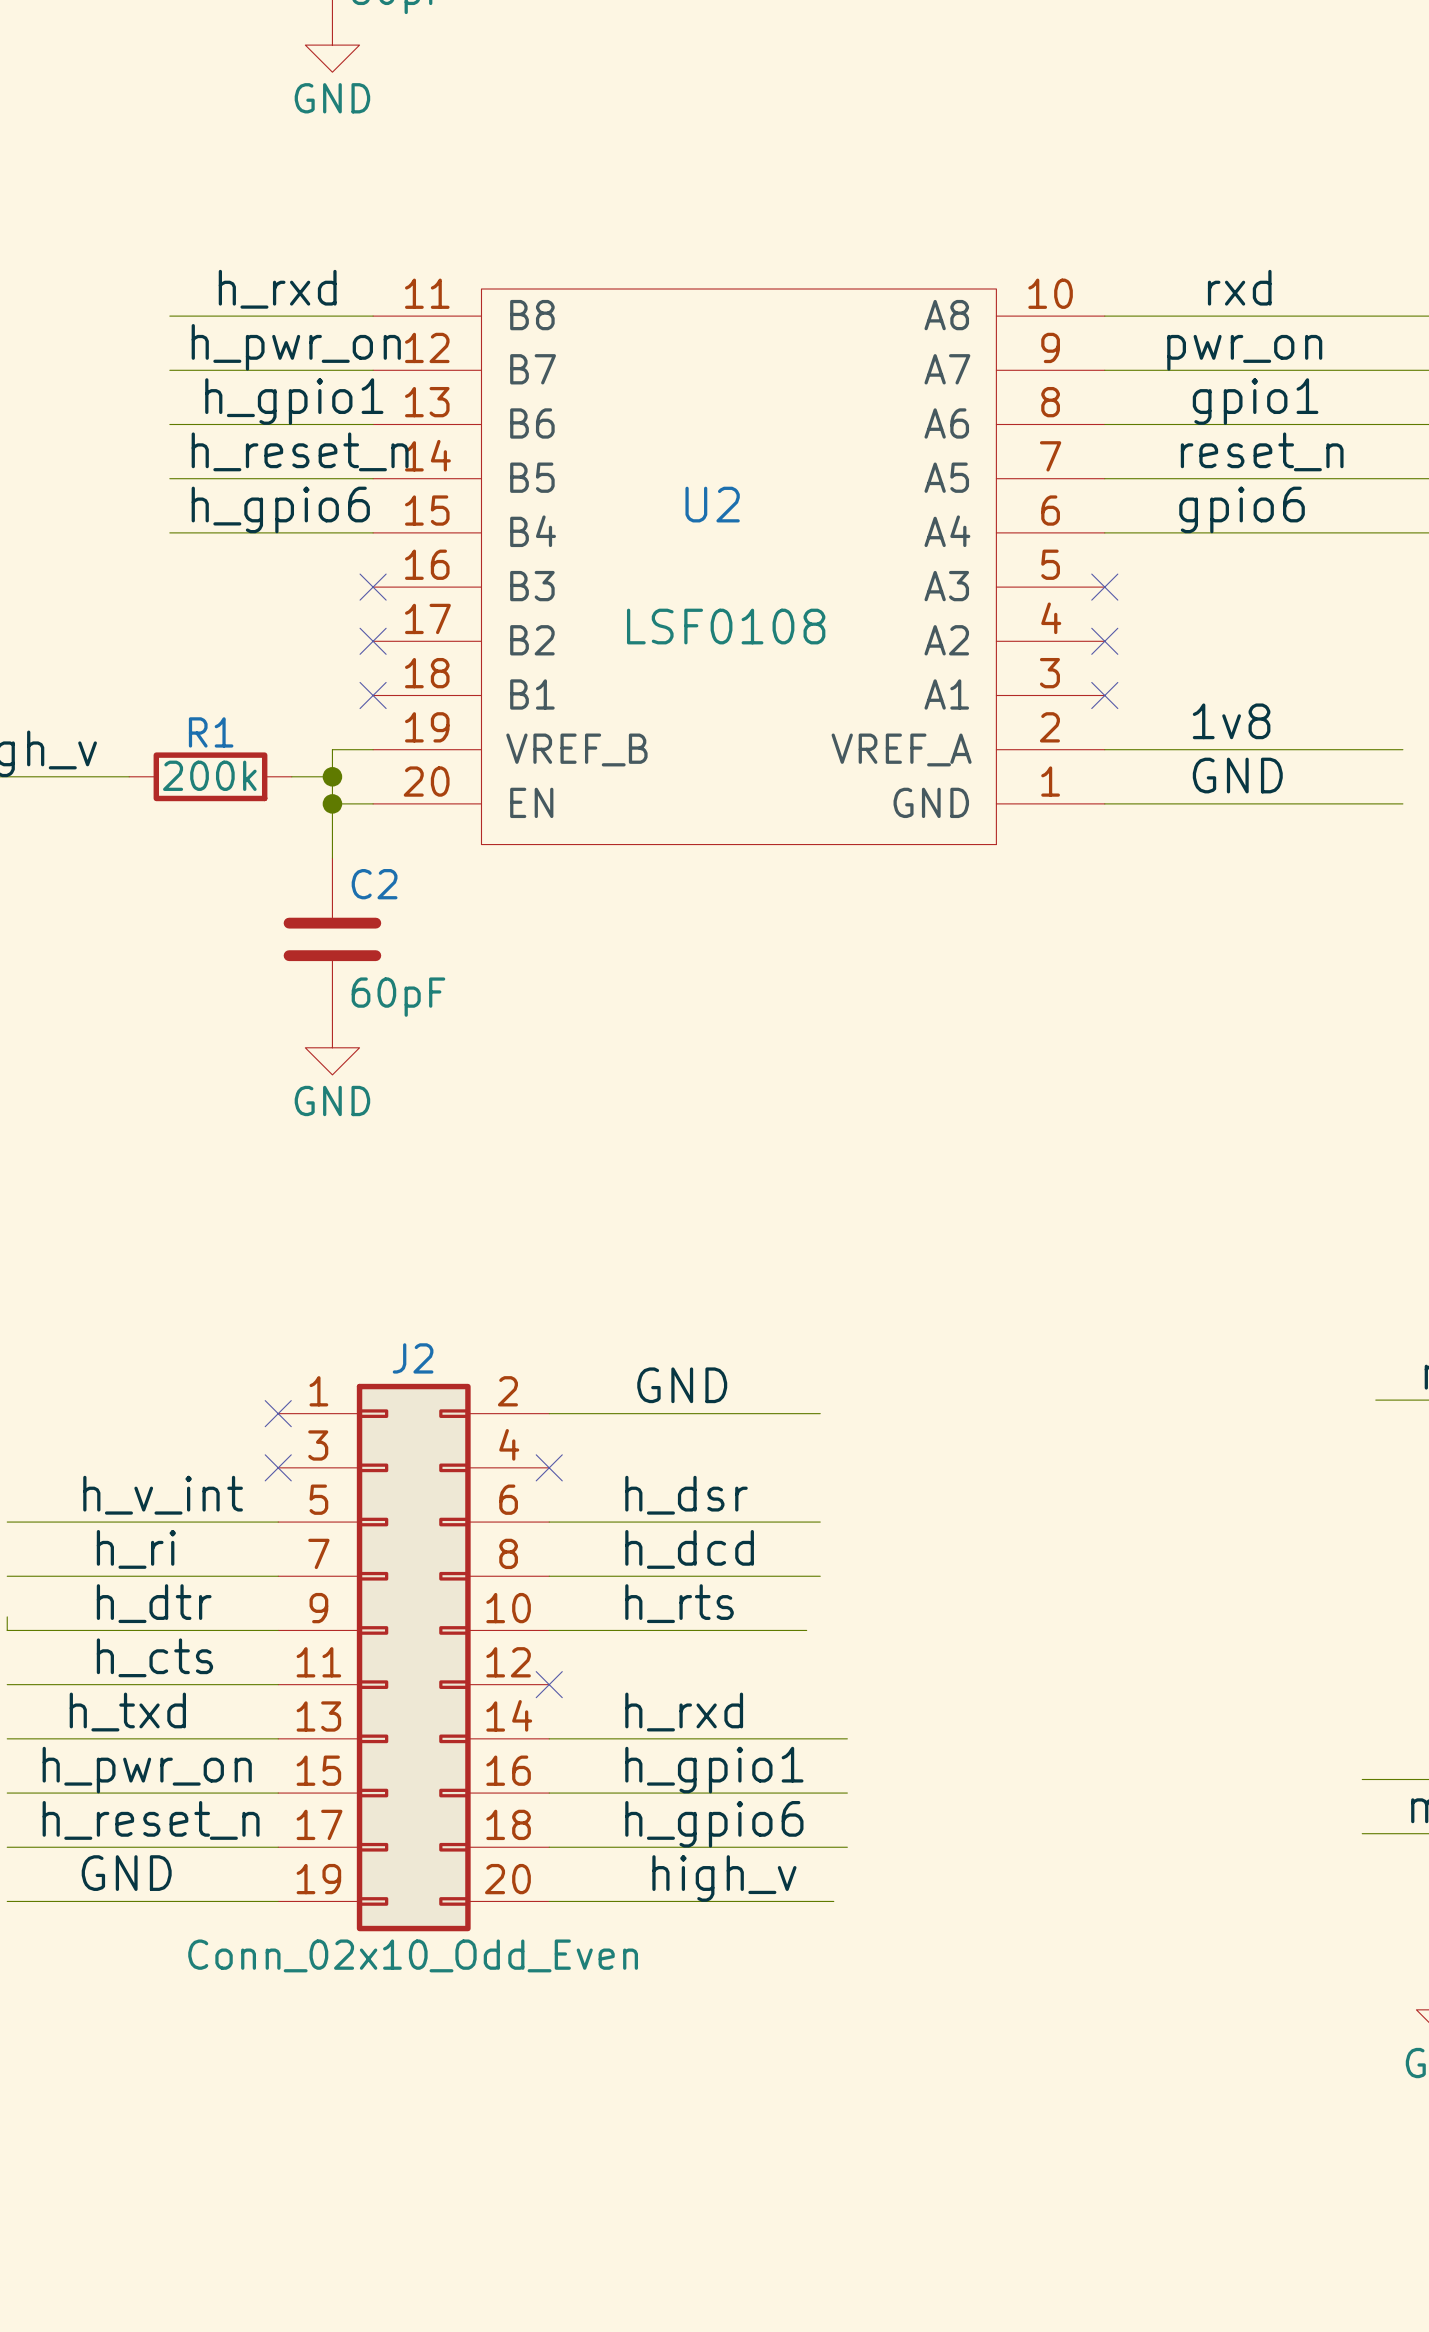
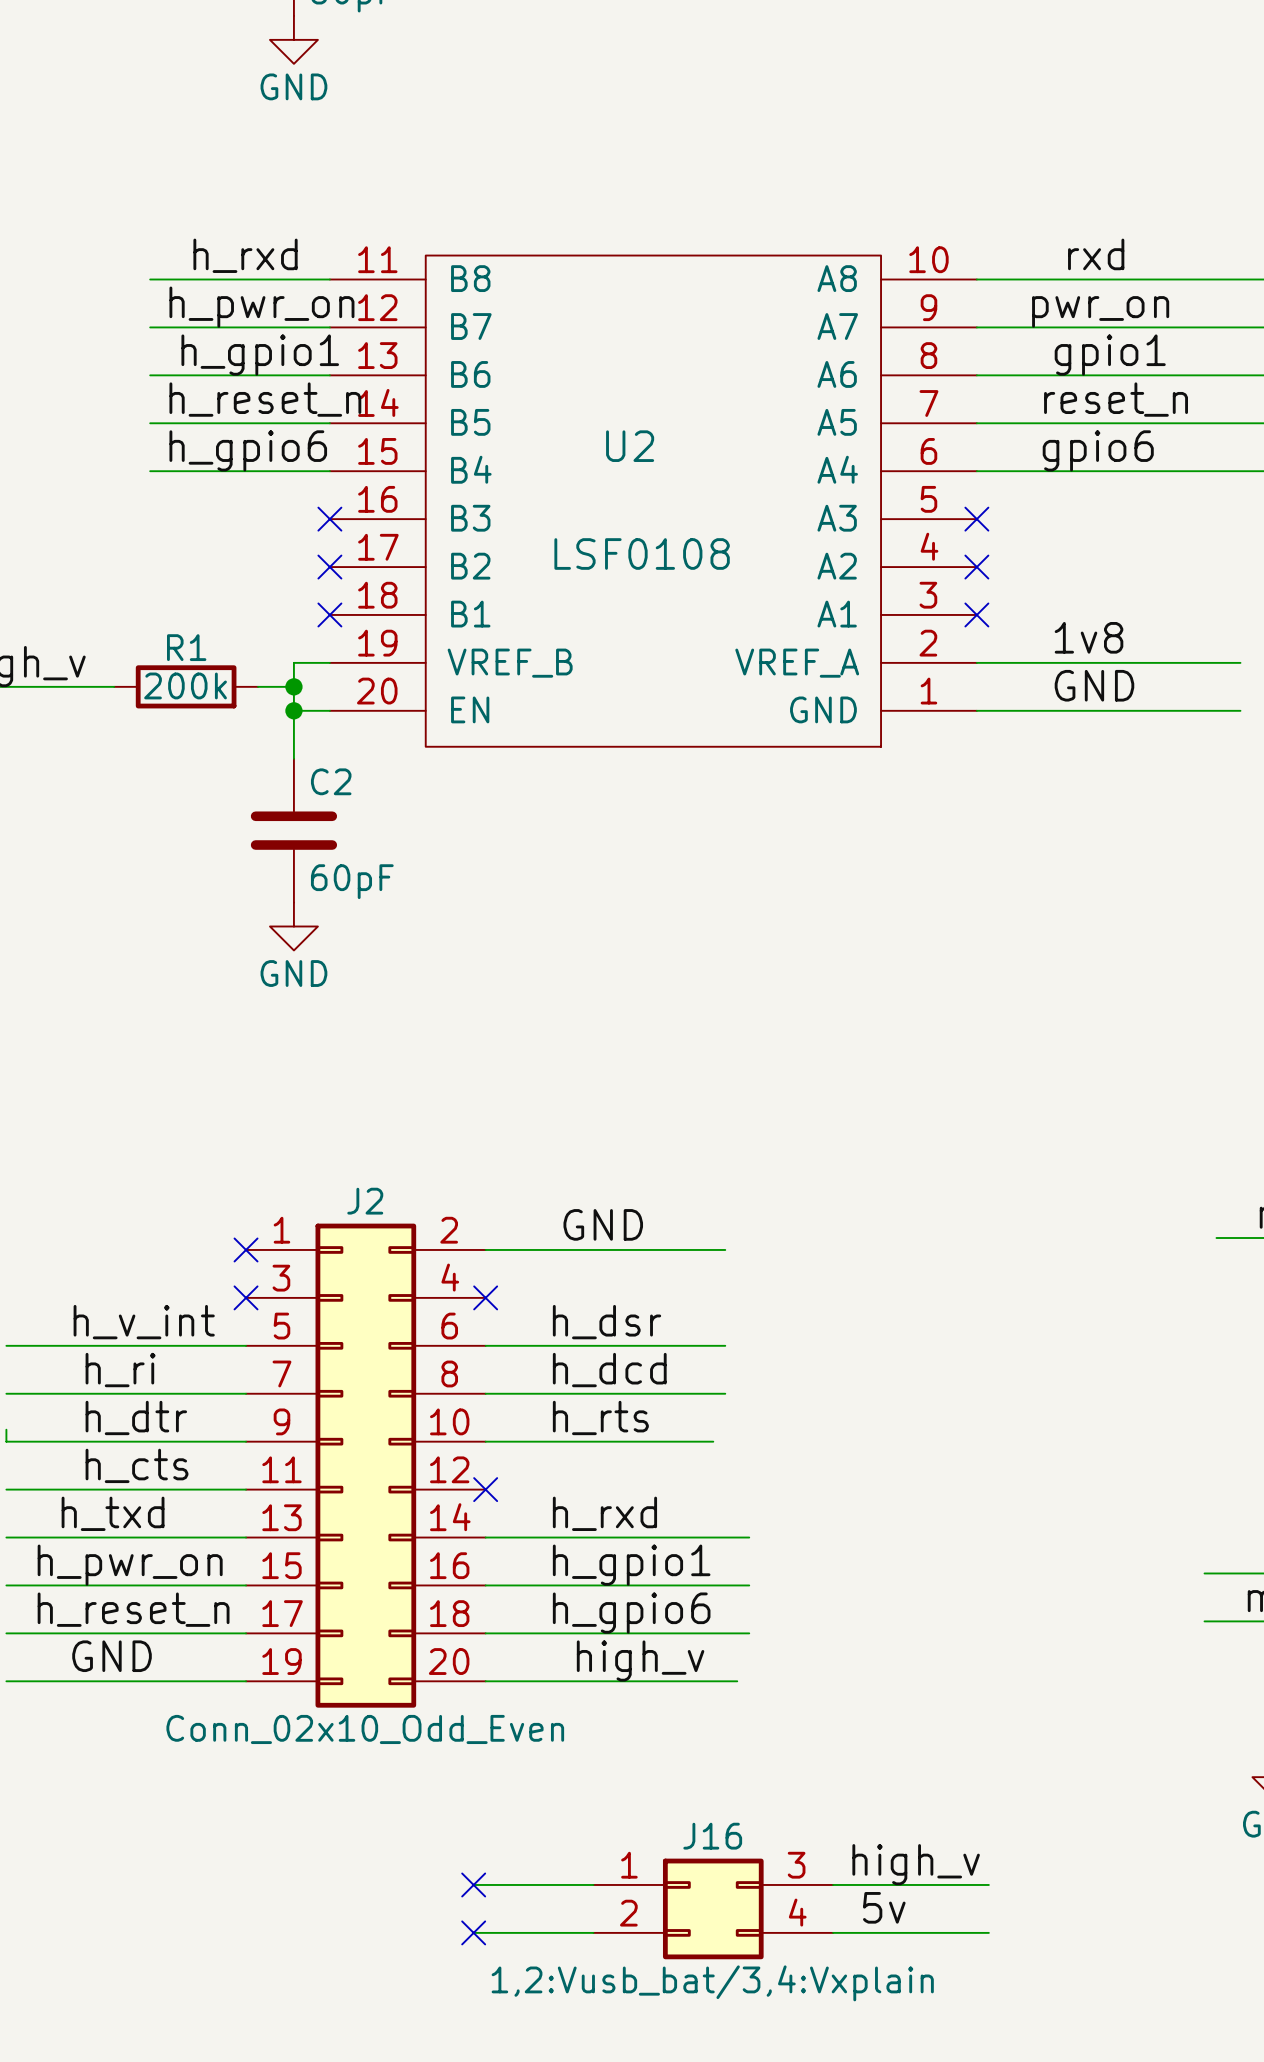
label: none -> high_v (916, 1864)
wire: none -> (473, 1884) (593, 1884)
no-connect mark: none -> (473, 1884)
wire: none -> (833, 1884) (988, 1884)
label: none -> 5v (884, 1907)
J16: none -> 1,2:Vusb_bat/3,4:Vxplain (713, 1908)
wire: none -> (473, 1932) (593, 1932)
no-connect mark: none -> (473, 1932)
wire: none -> (833, 1932) (988, 1932)

